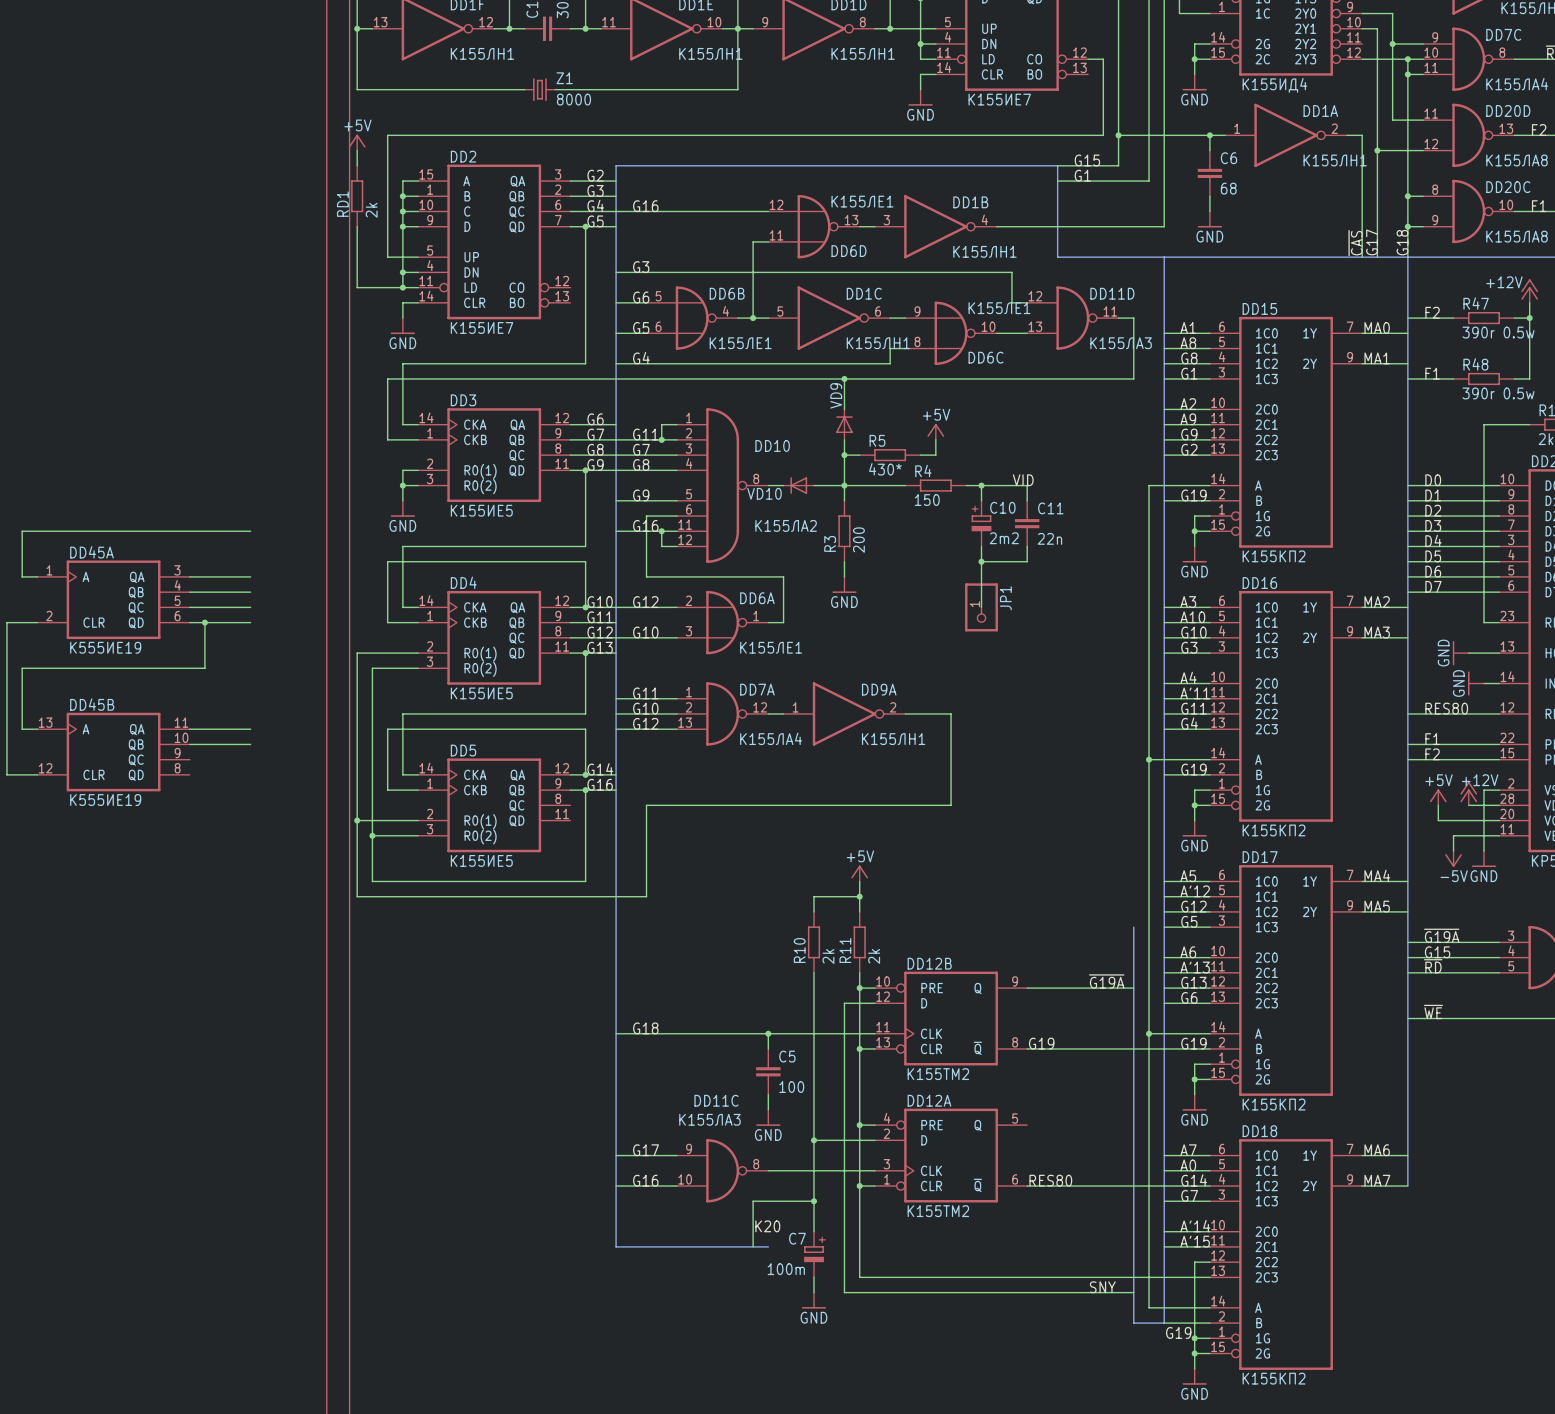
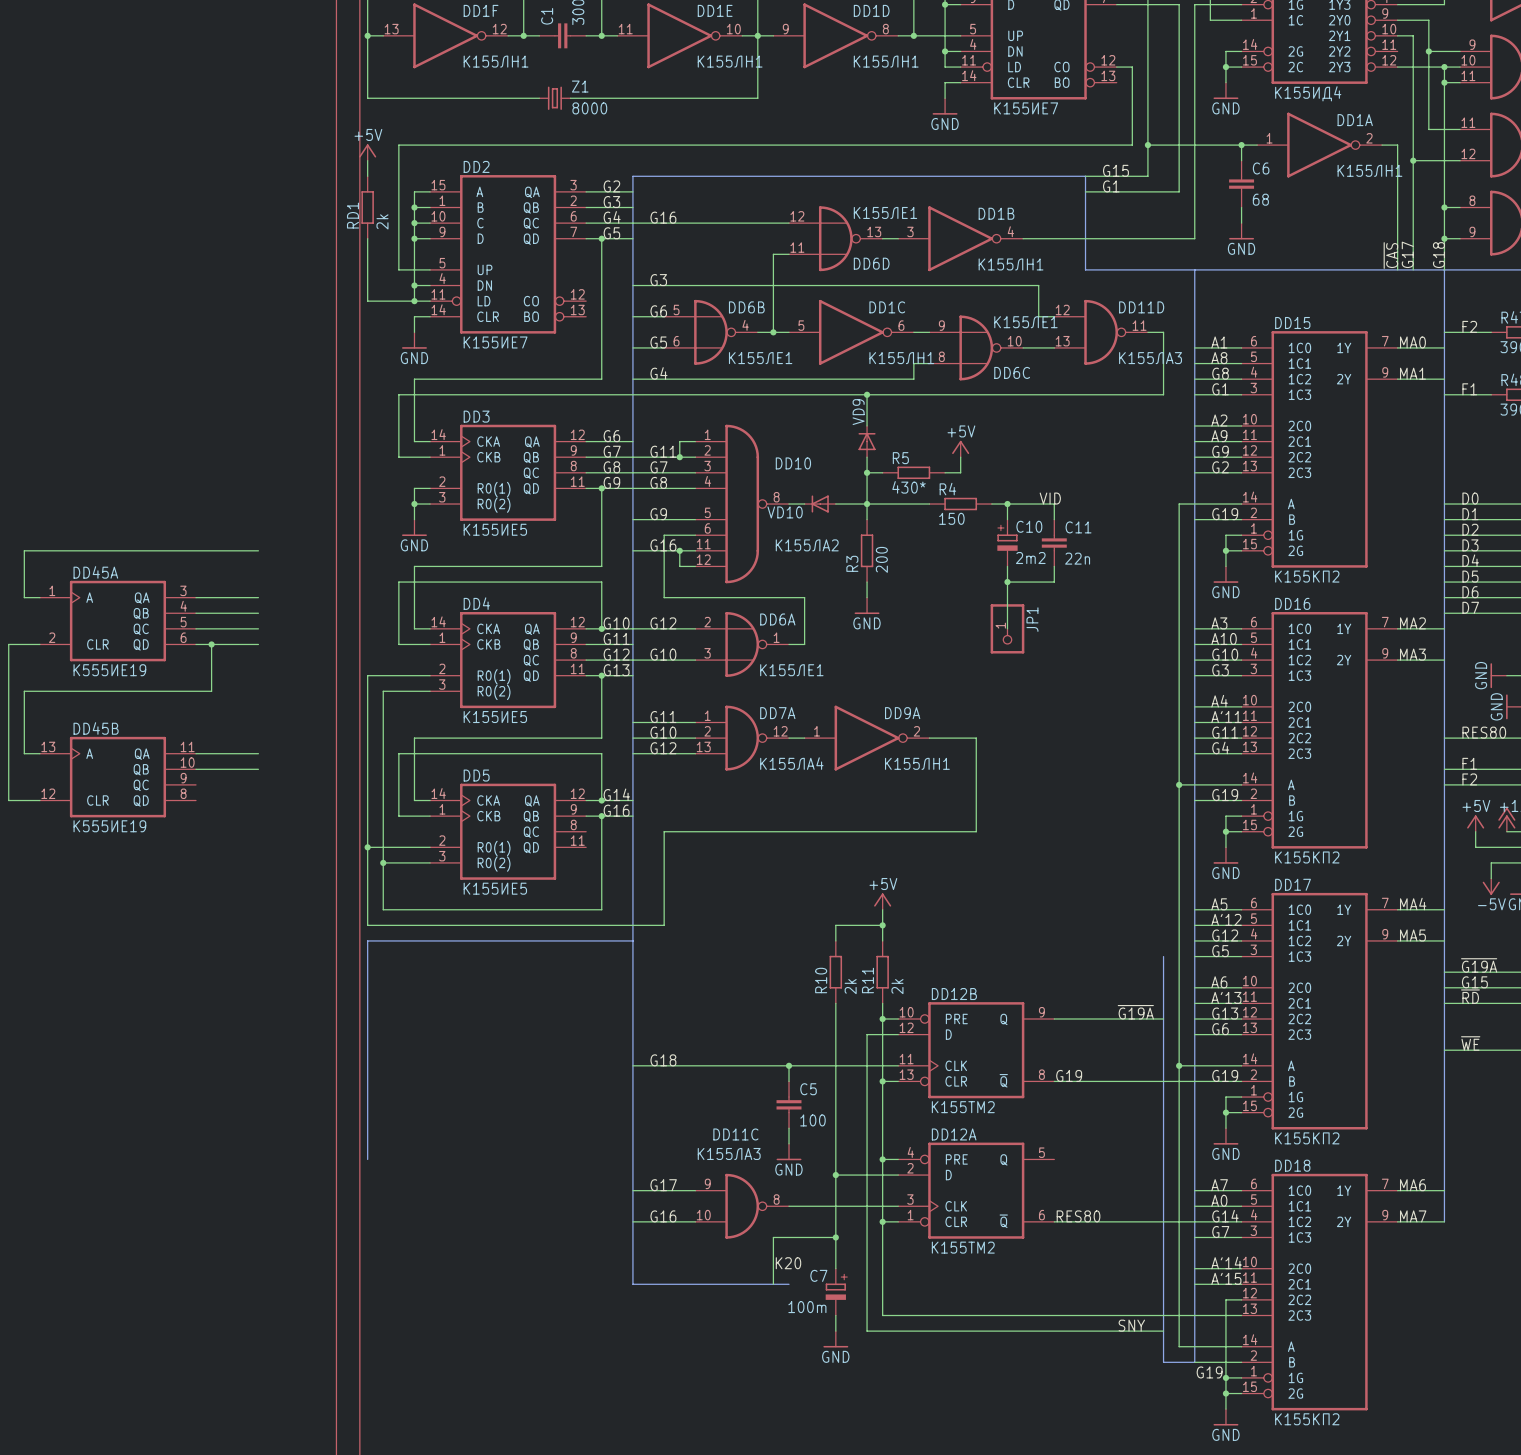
bus: none -> (632, 940) (367, 940) (367, 1159)

